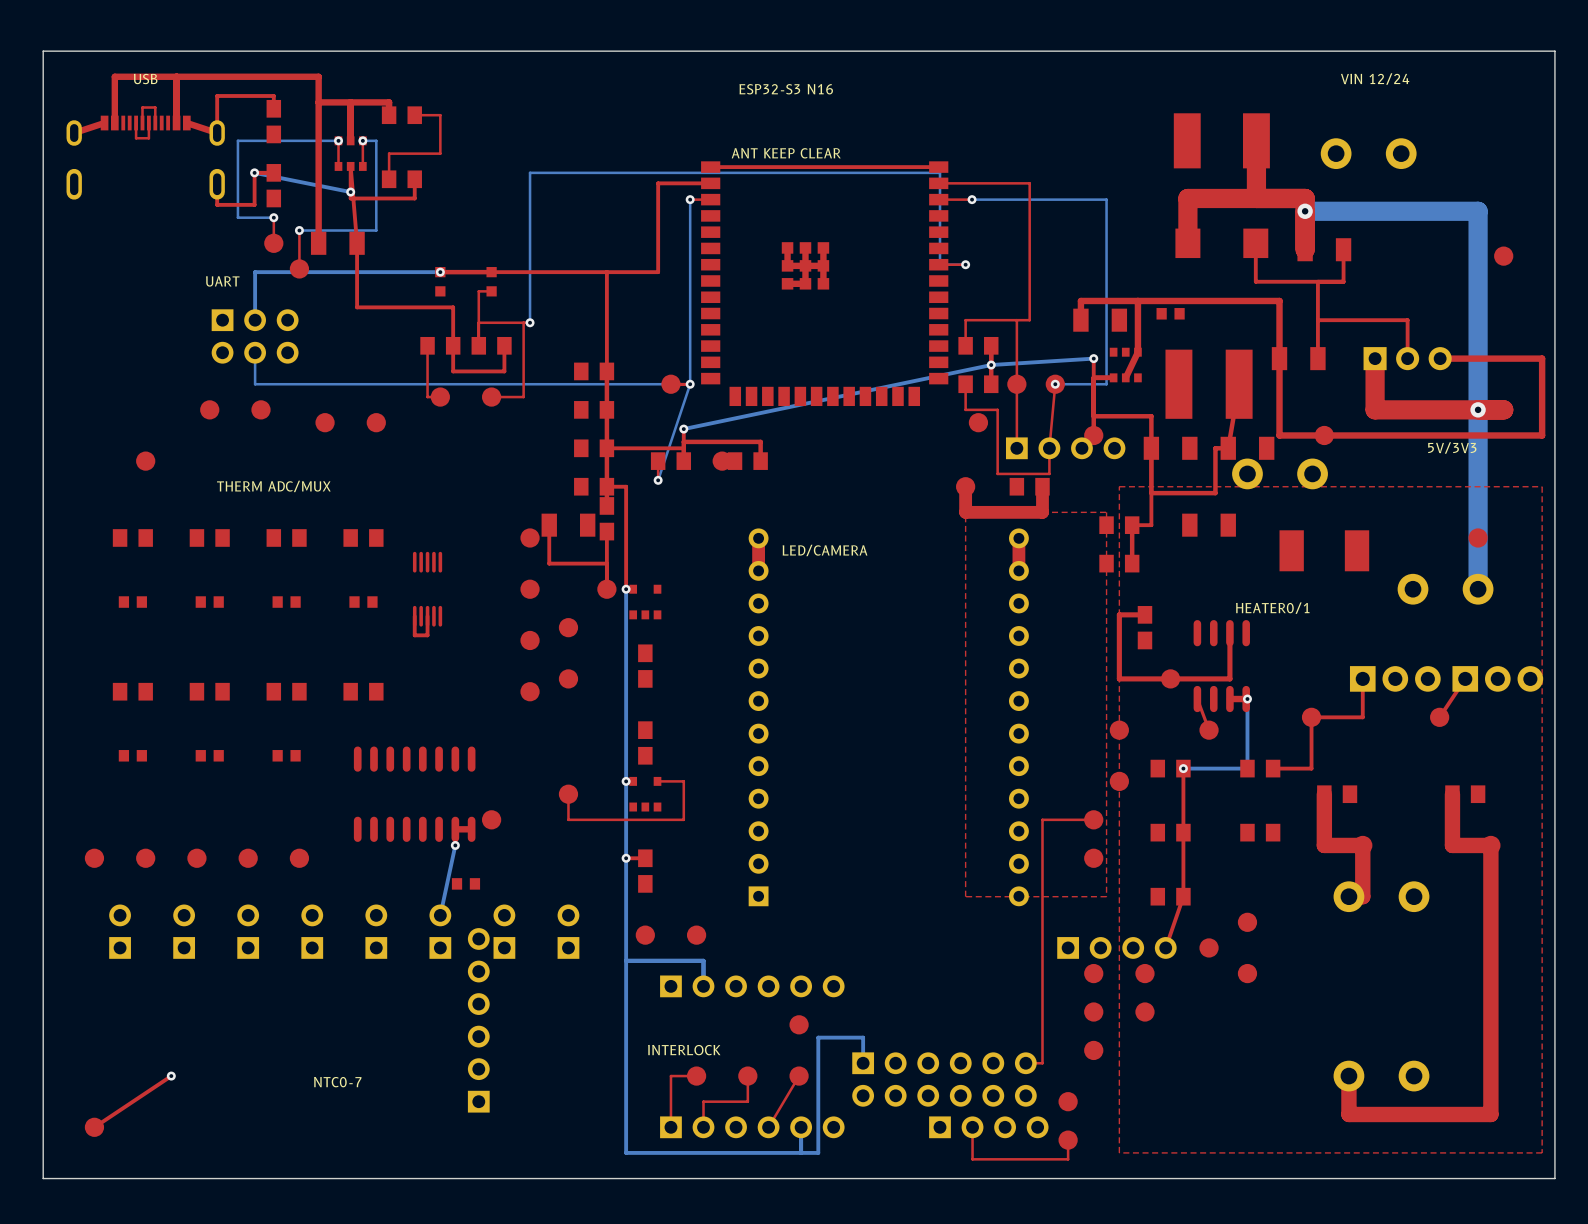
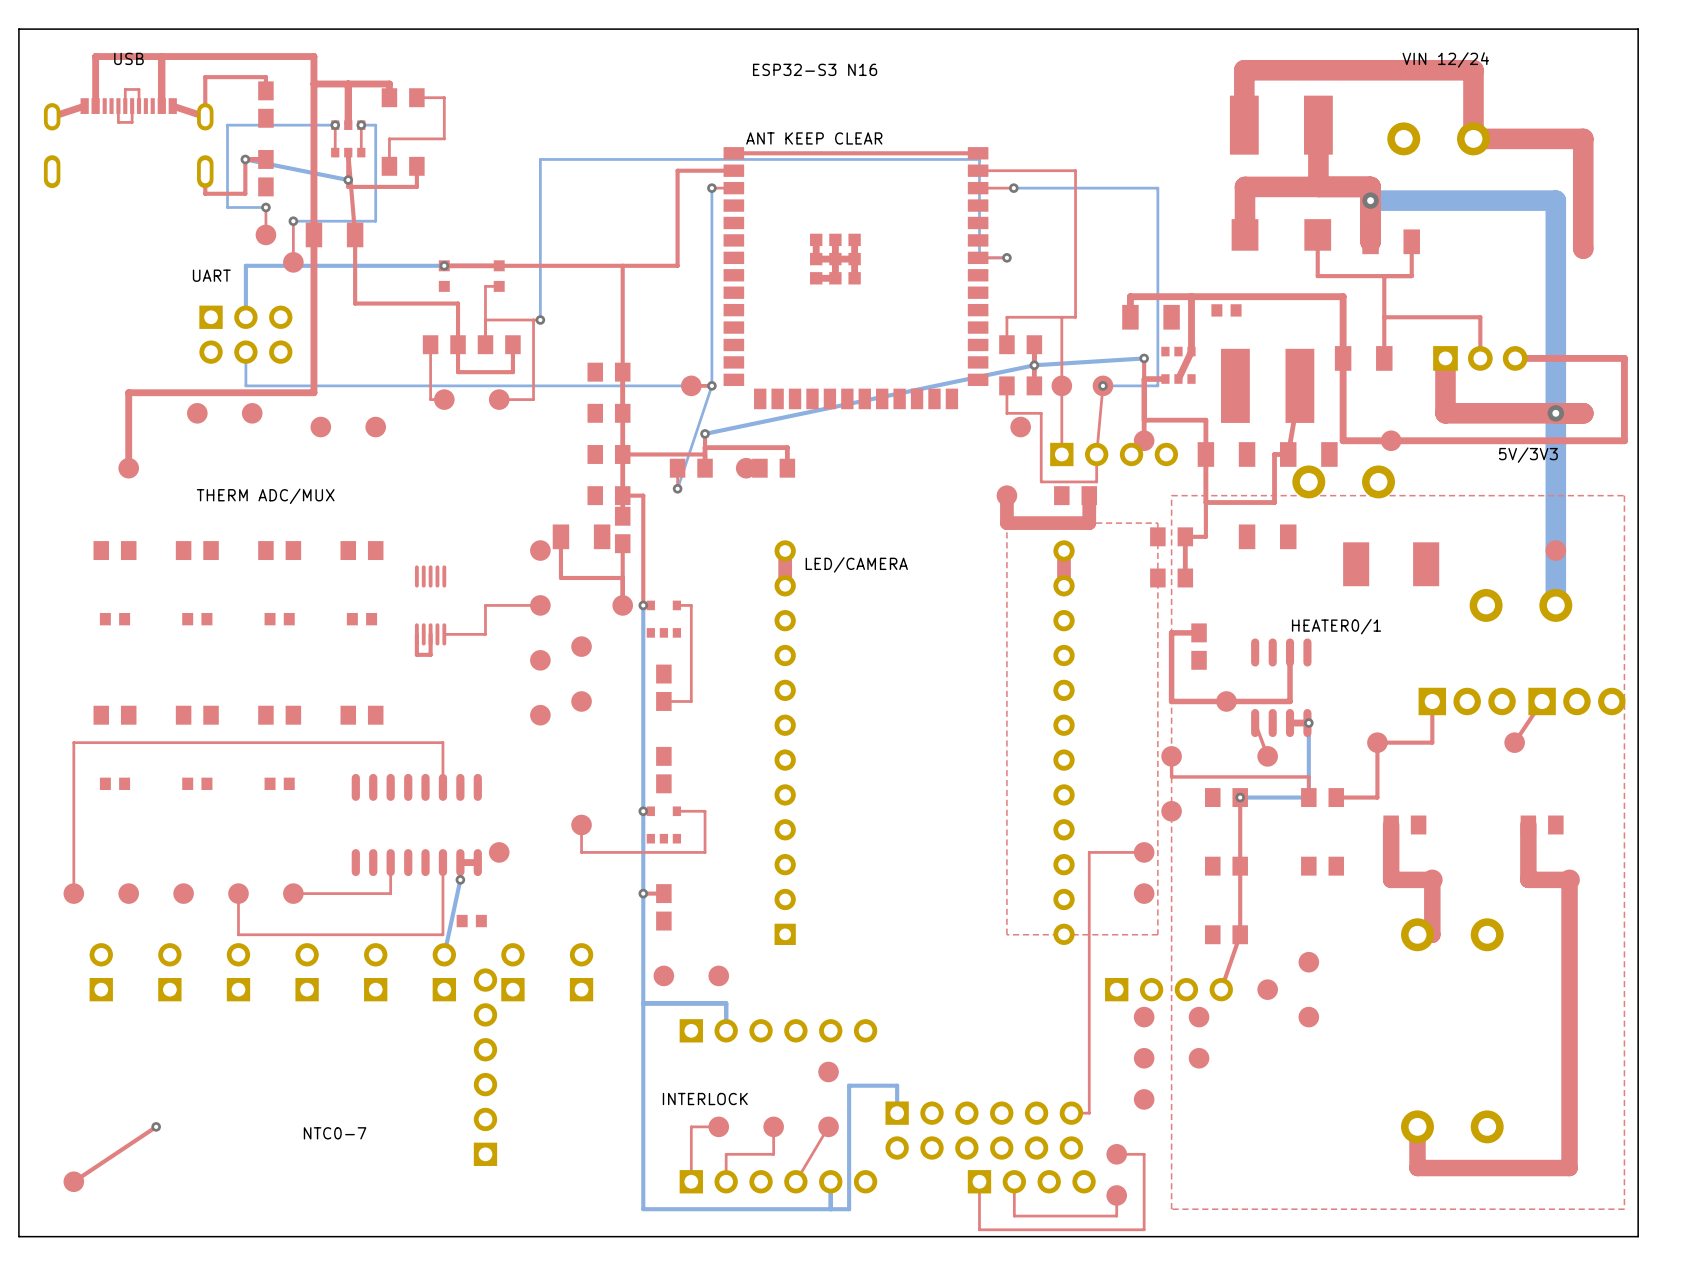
top track: none -> (1244, 125) (1244, 70) (1473, 70) (1473, 138) (1583, 138) (1583, 248)
top track: none -> (313, 234) (313, 392) (128, 392) (128, 468)
top track: none -> (540, 605) (485, 605) (485, 634) (444, 634)
top track: none -> (676, 605) (691, 605) (691, 701) (663, 701)
top track: none -> (1171, 756) (1171, 776) (1308, 776) (1308, 797)
top track: none -> (442, 787) (442, 742) (73, 742) (73, 893)
top track: none -> (390, 862) (390, 893) (293, 893)
top track: none -> (442, 862) (442, 934) (238, 934) (238, 893)
top track: none -> (1116, 1154) (1144, 1154) (1144, 1229) (979, 1229) (979, 1181)

